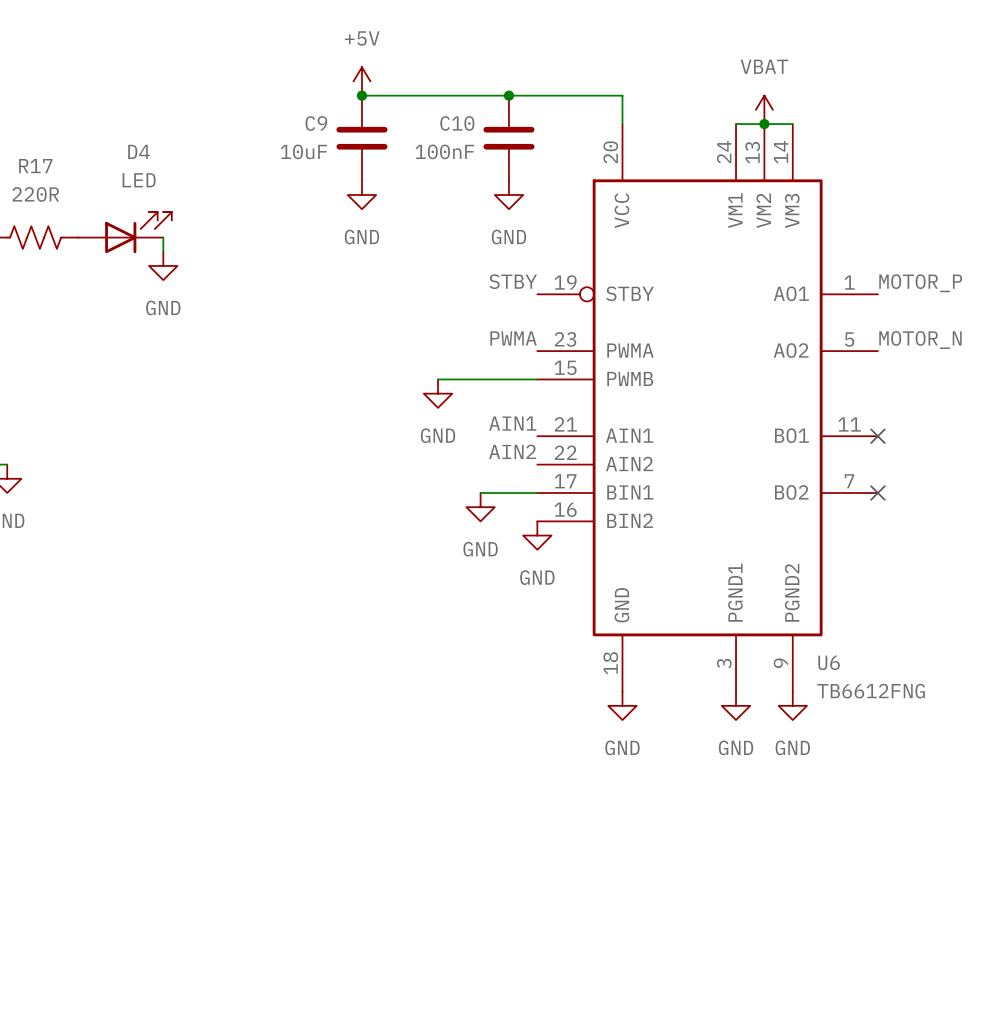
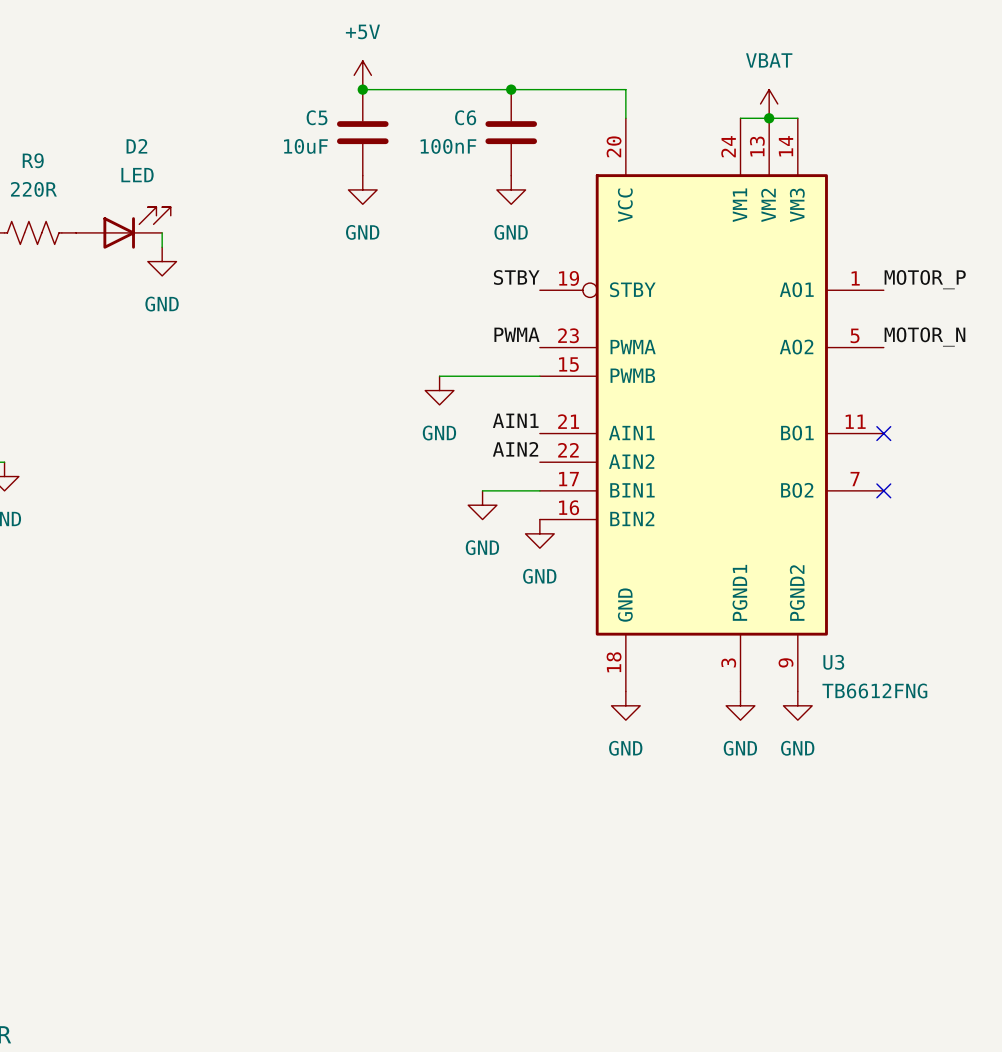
C9 name: C9 (316, 123) -> C5 (317, 117)
C10 name: C10 (457, 123) -> C6 (465, 117)
D4 name: D4 (139, 151) -> D2 (136, 146)
R17 name: R17 (35, 166) -> R9 (33, 160)
U6 name: U6 (829, 662) -> U3 (833, 662)

